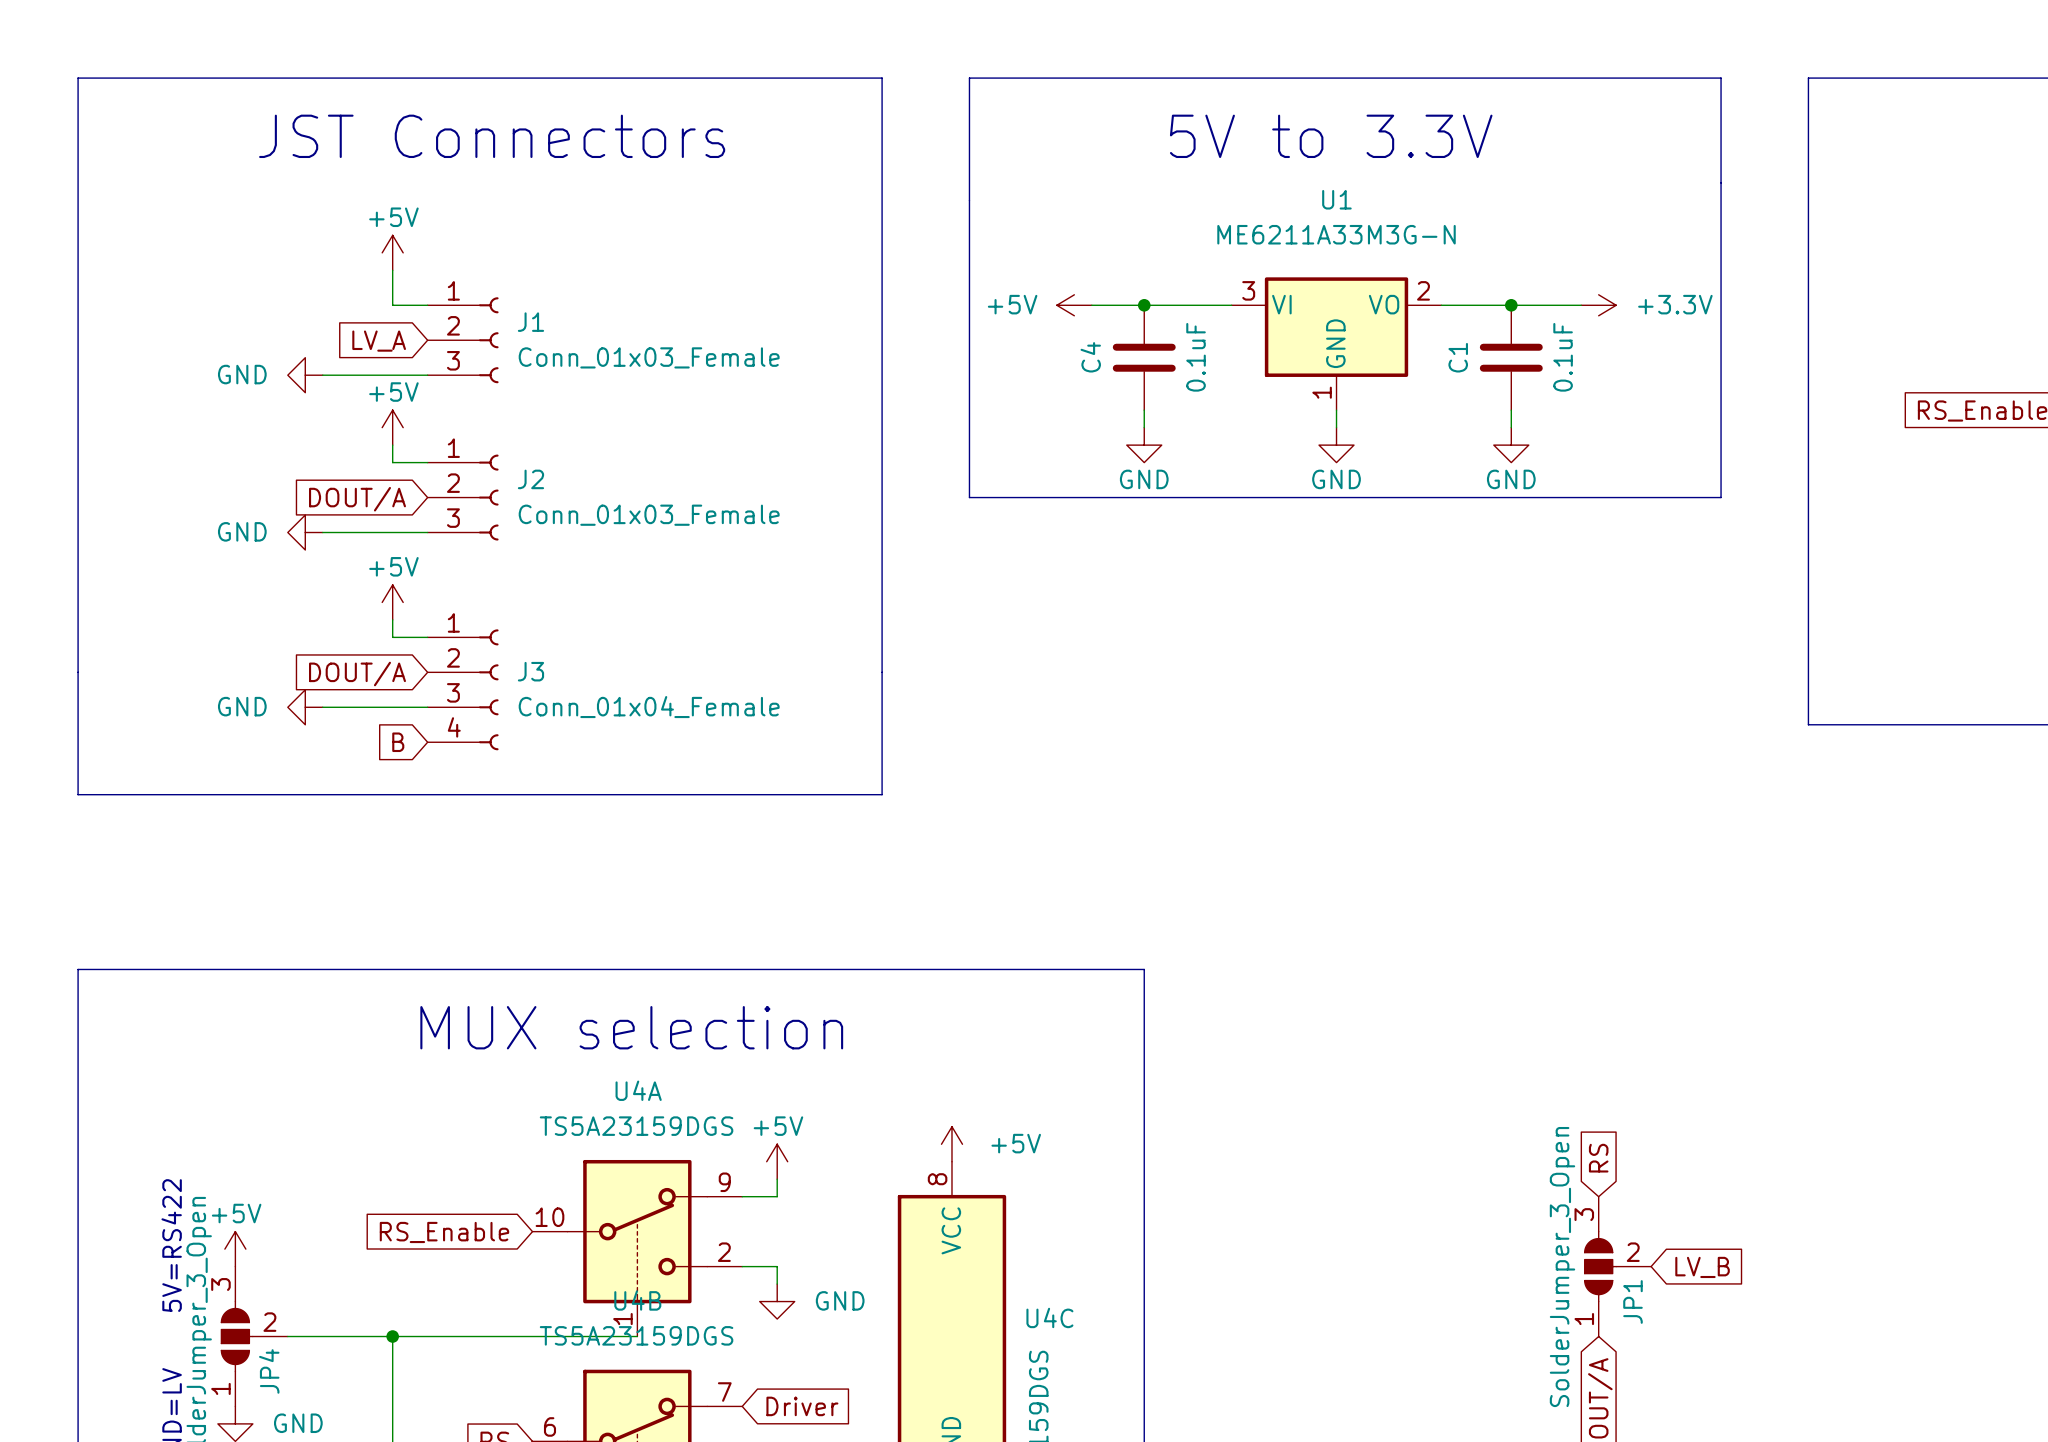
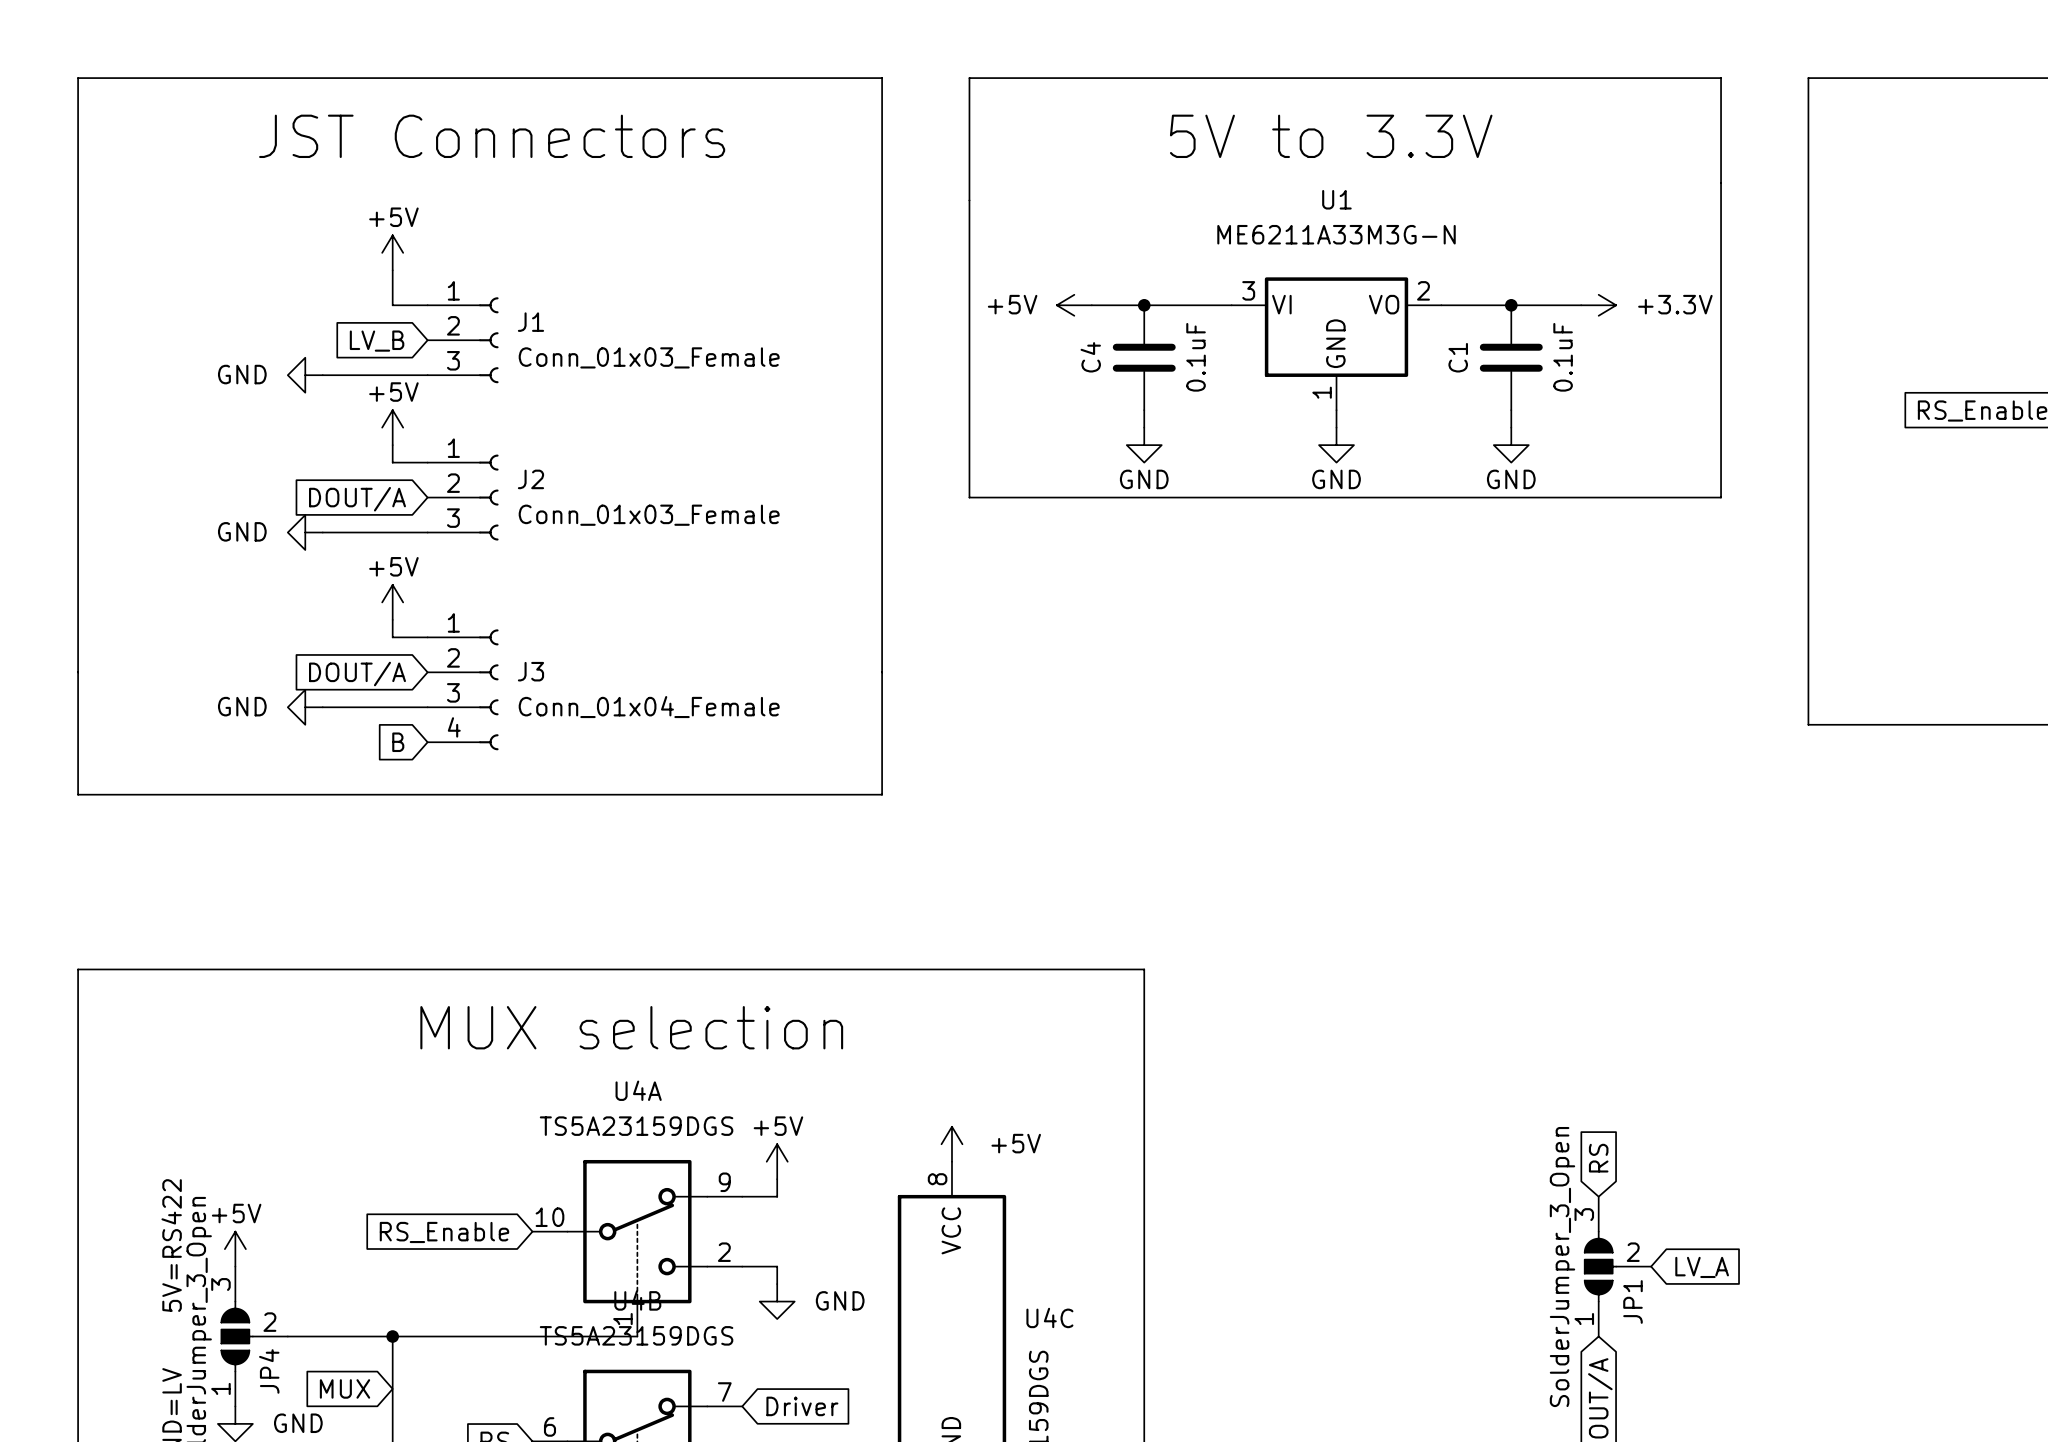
global label: LV_A (379, 341) -> LV_B (377, 341)
global label: LV_B (1702, 1267) -> LV_A (1702, 1267)
global label: none -> MUX (345, 1388)

